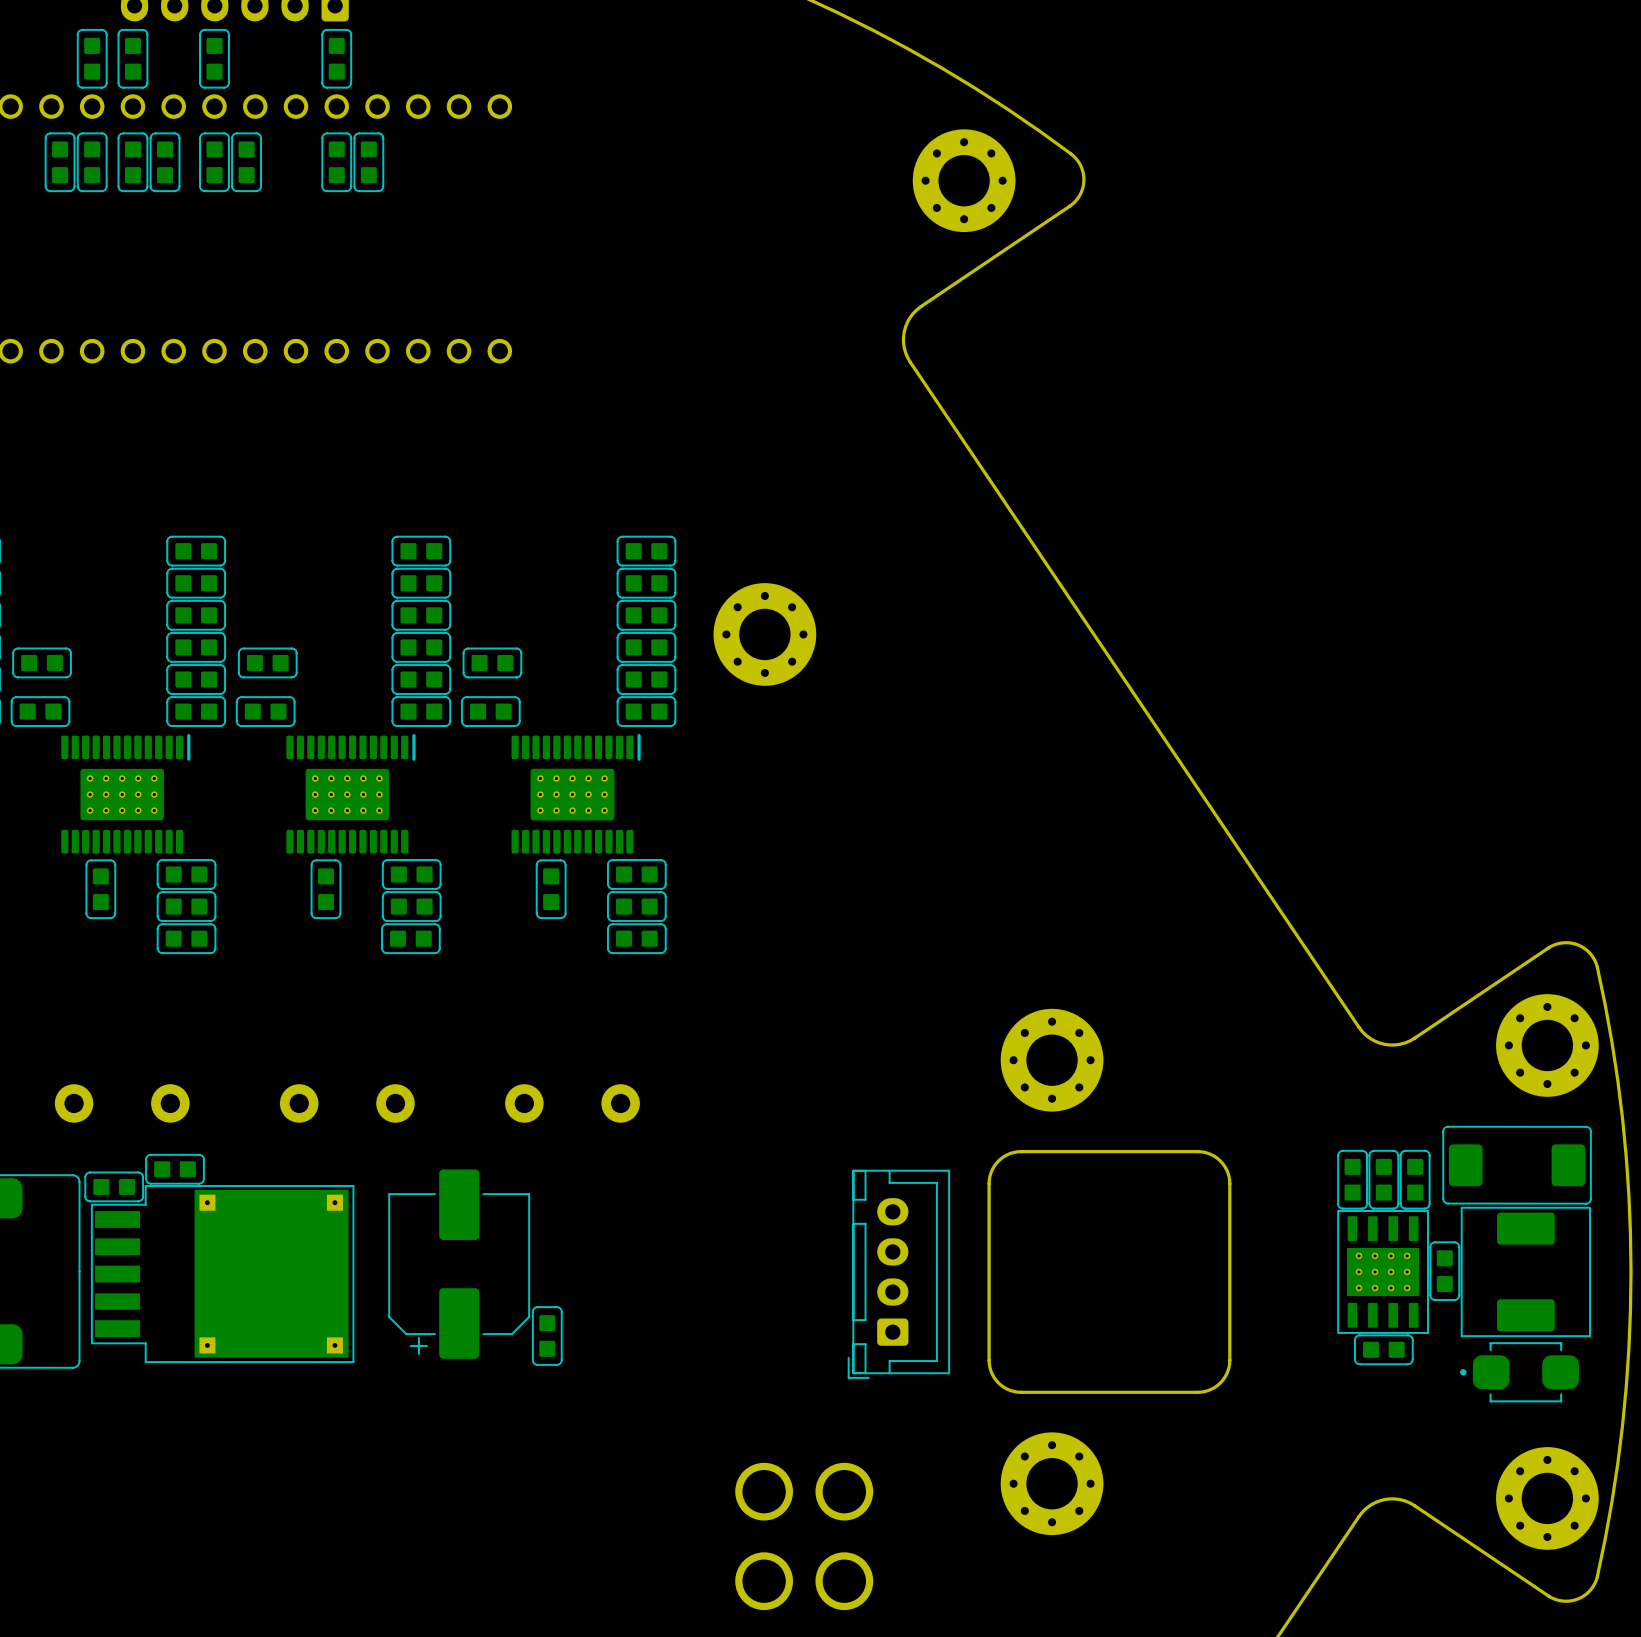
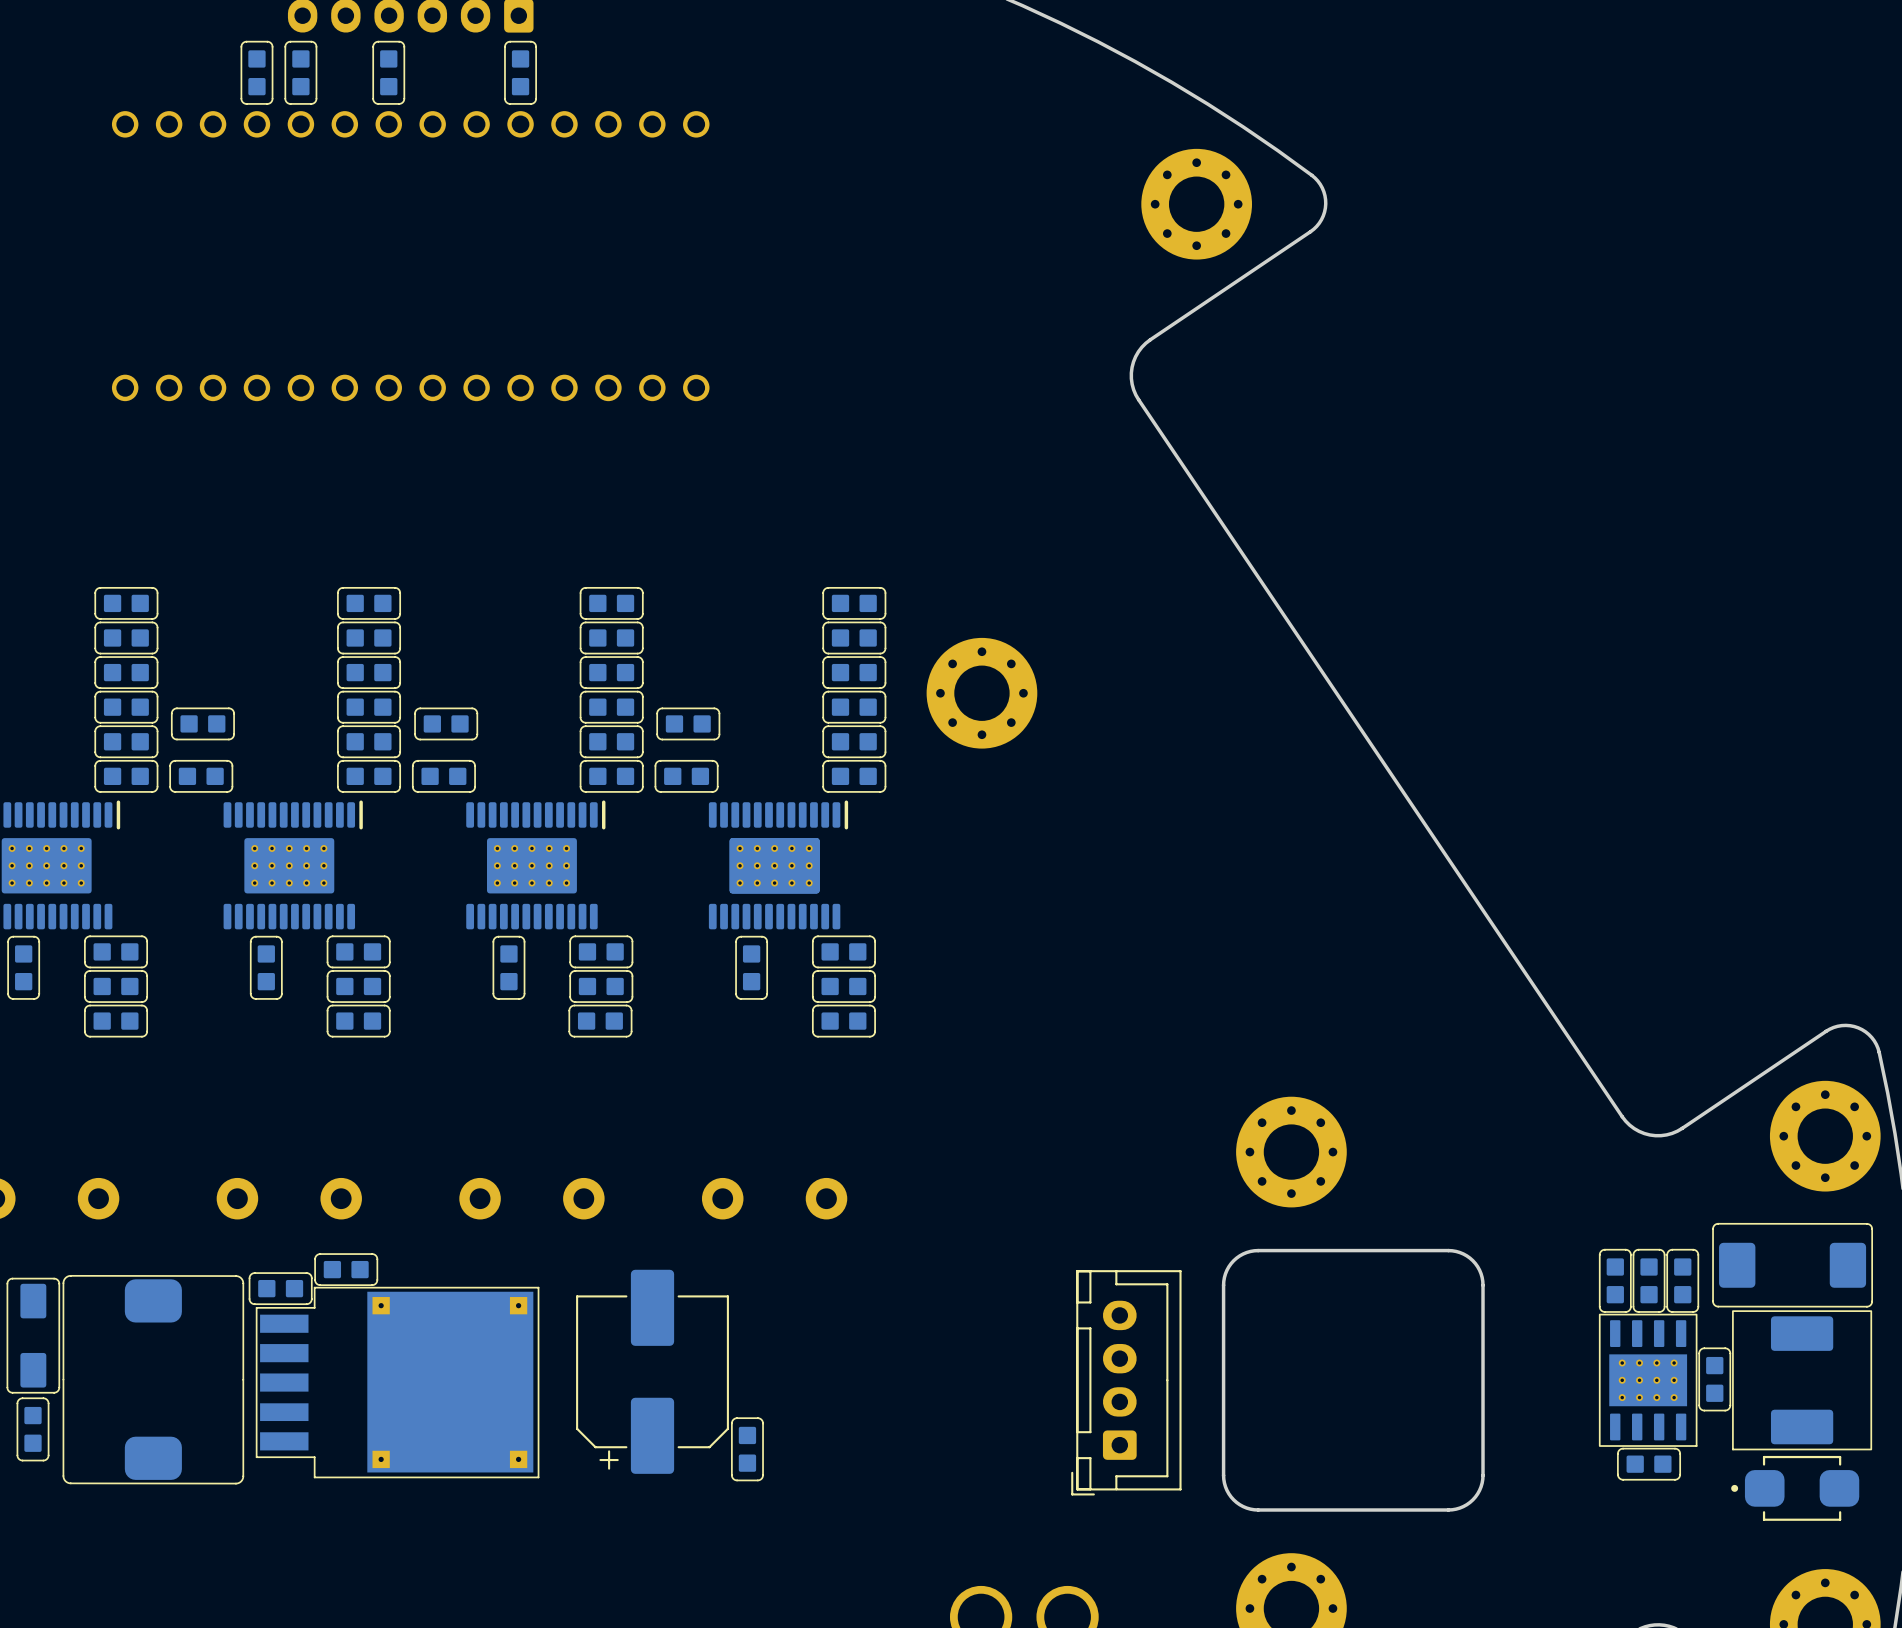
part: (60, 162) -> none
part: (92, 162) -> none
part: (132, 162) -> none
part: (165, 162) -> none
part: (214, 162) -> none
part: (246, 162) -> none
part: (336, 162) -> none
part: (368, 162) -> none

